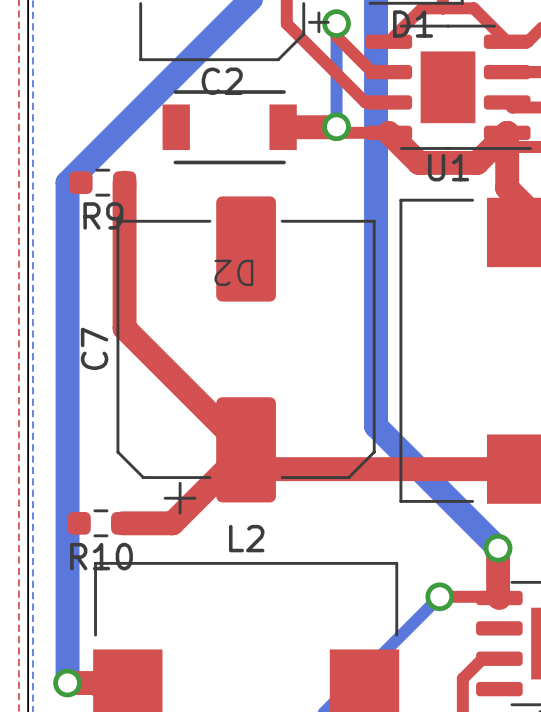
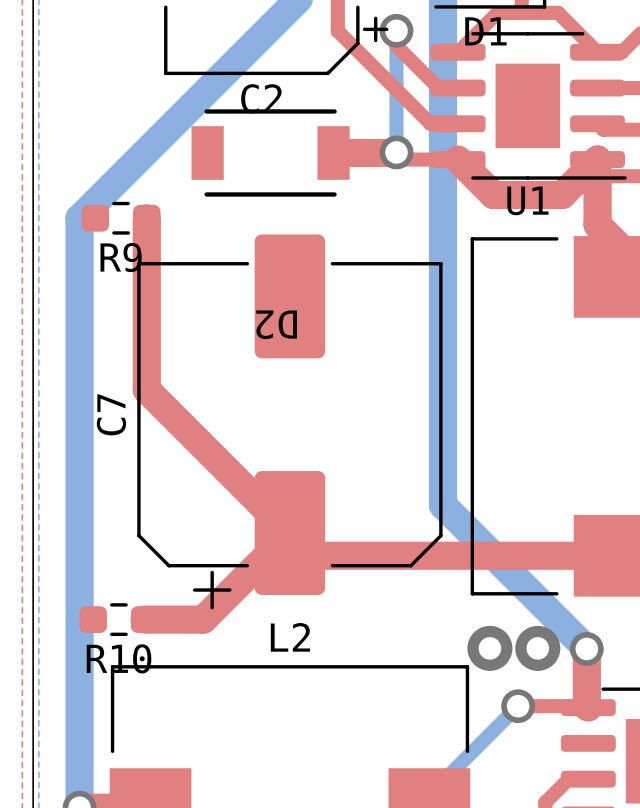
via: none -> (489, 648)
via: none -> (537, 648)

